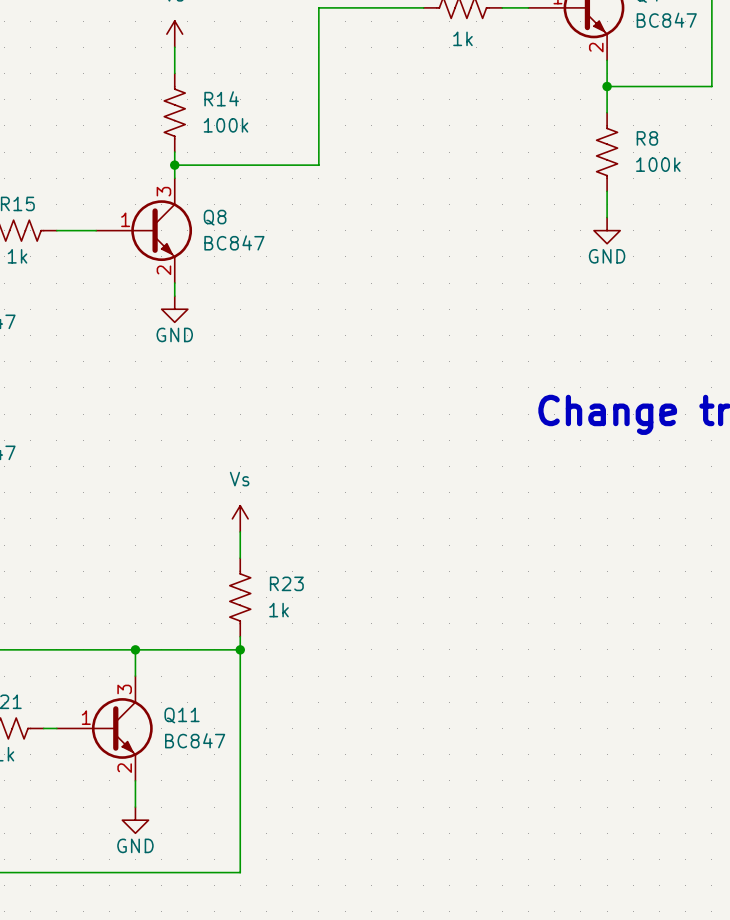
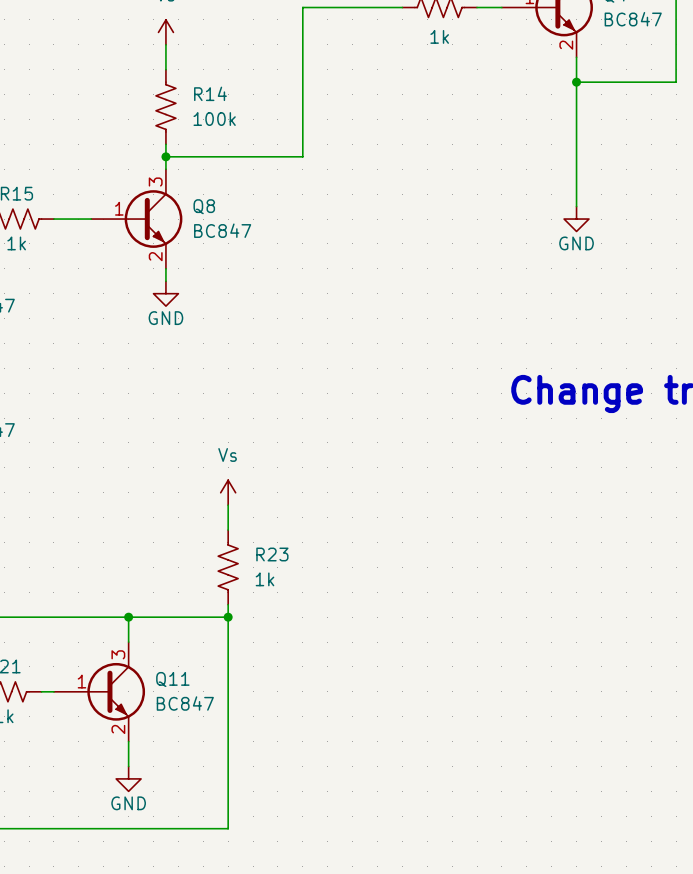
R8: 100k (607, 152) -> none

